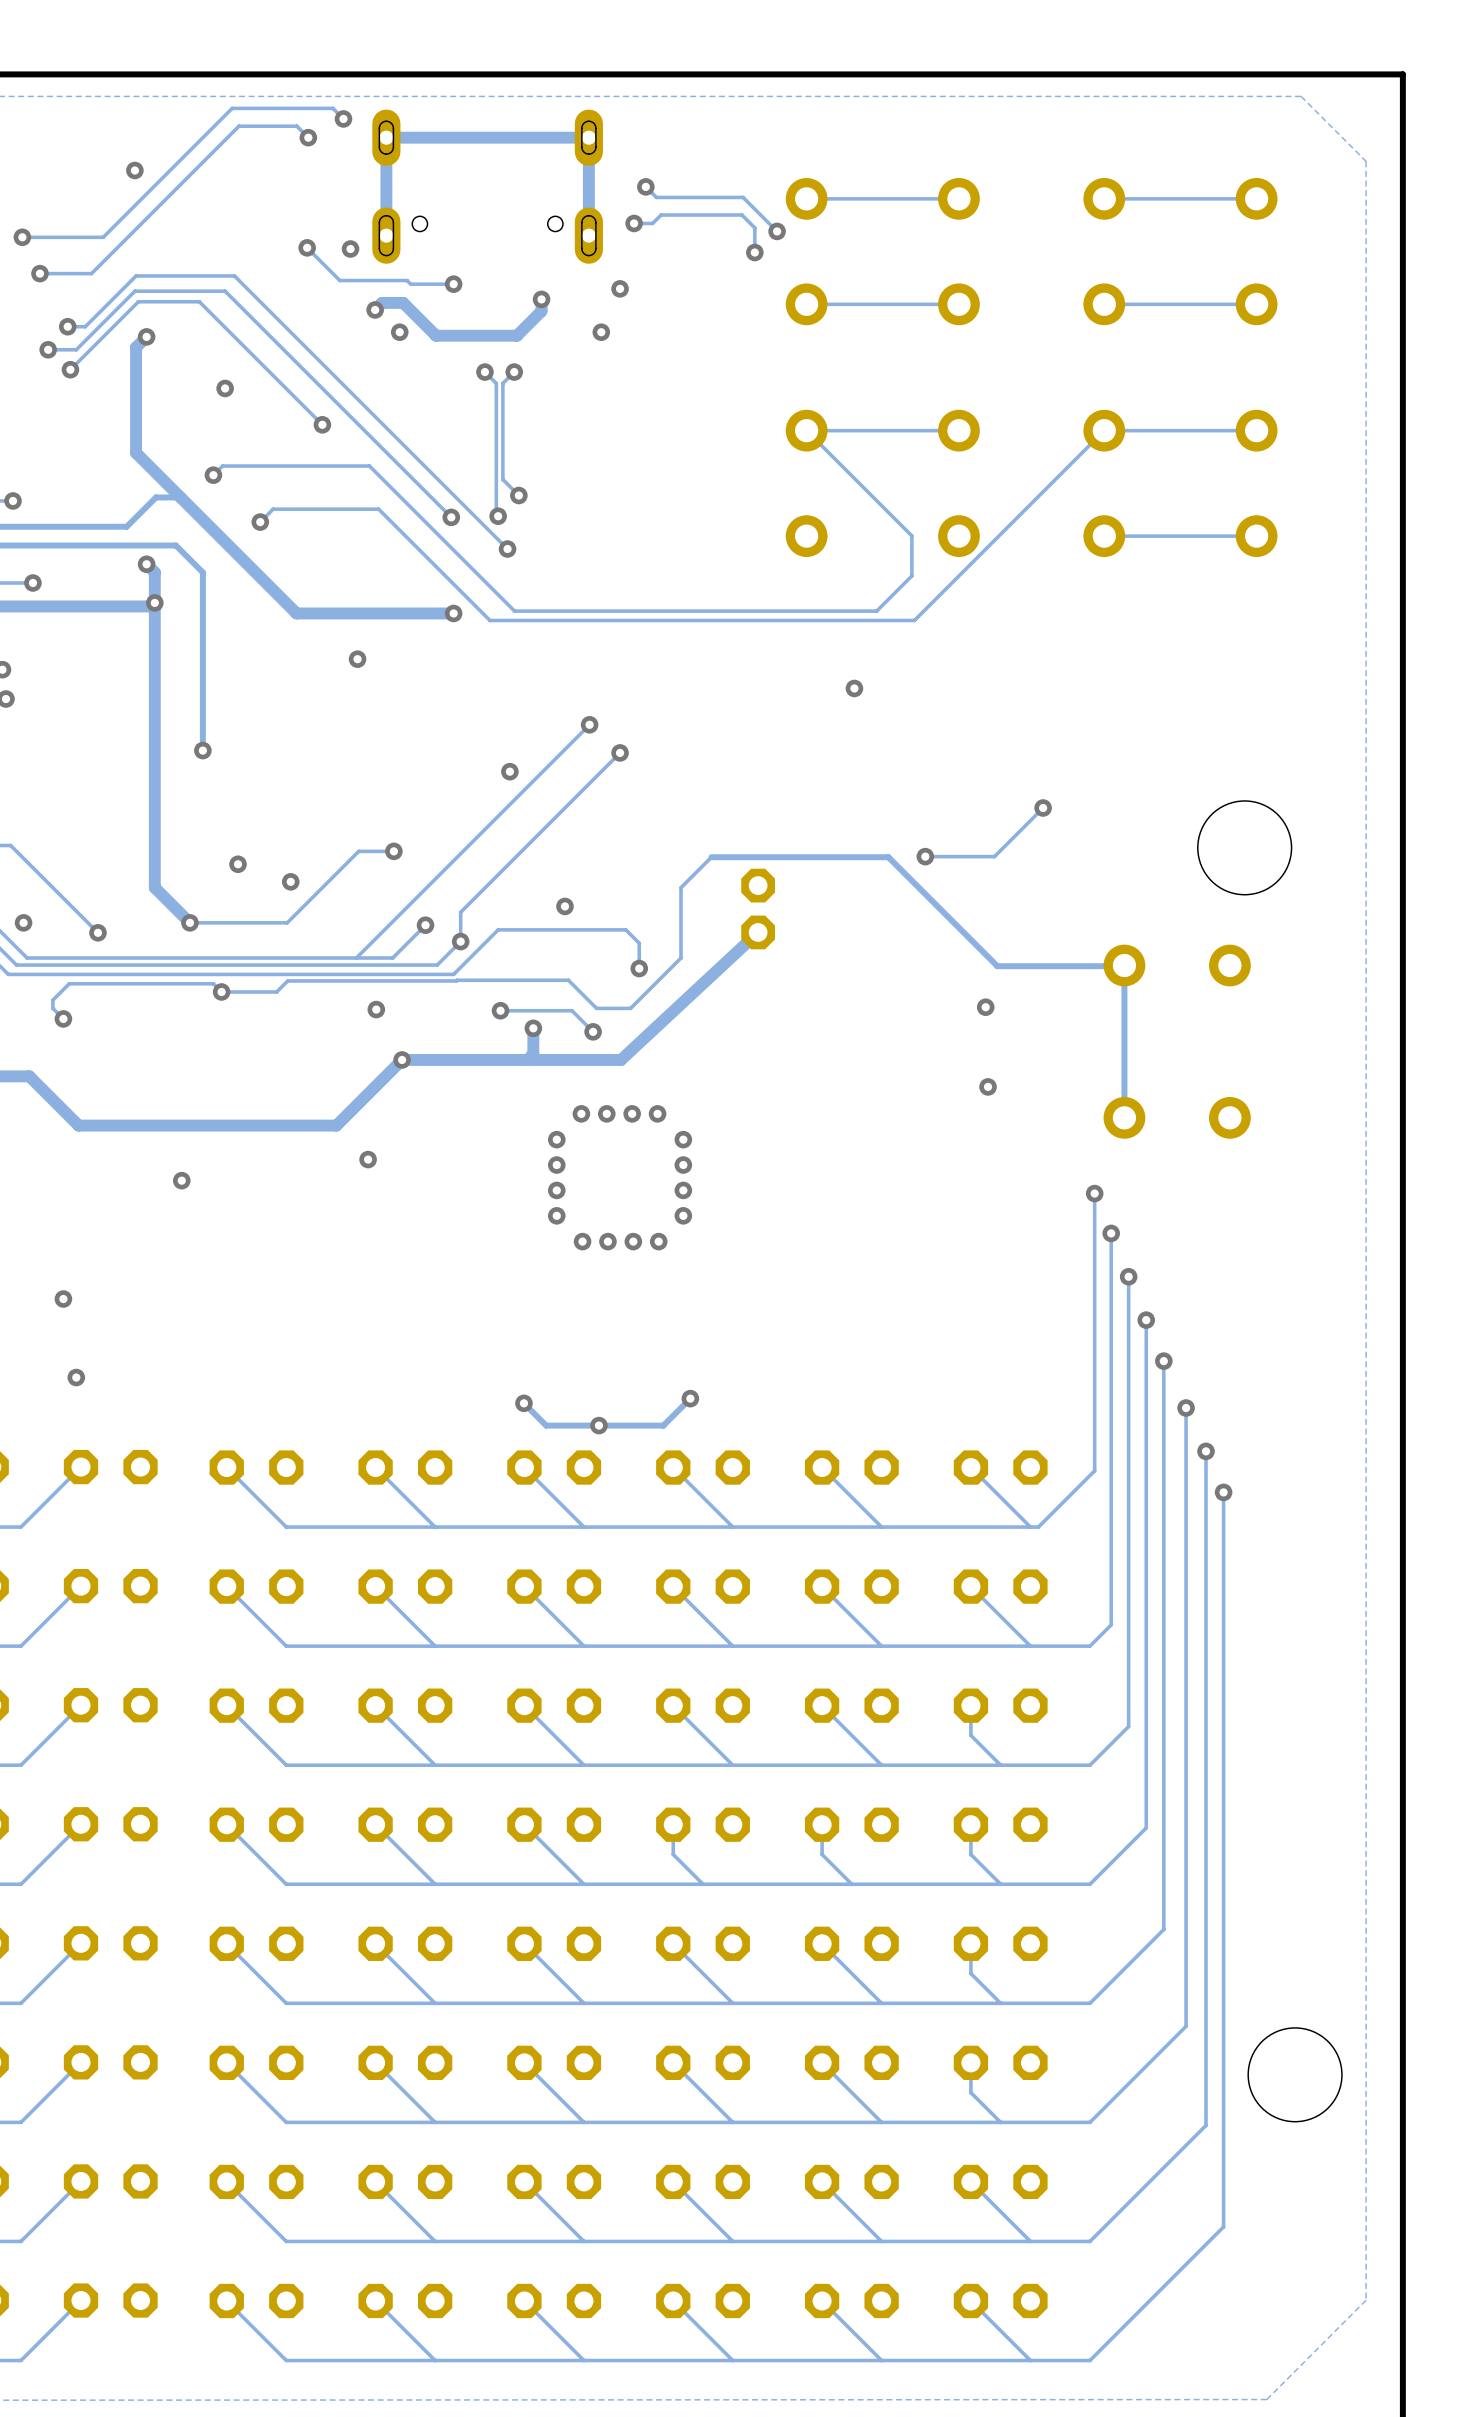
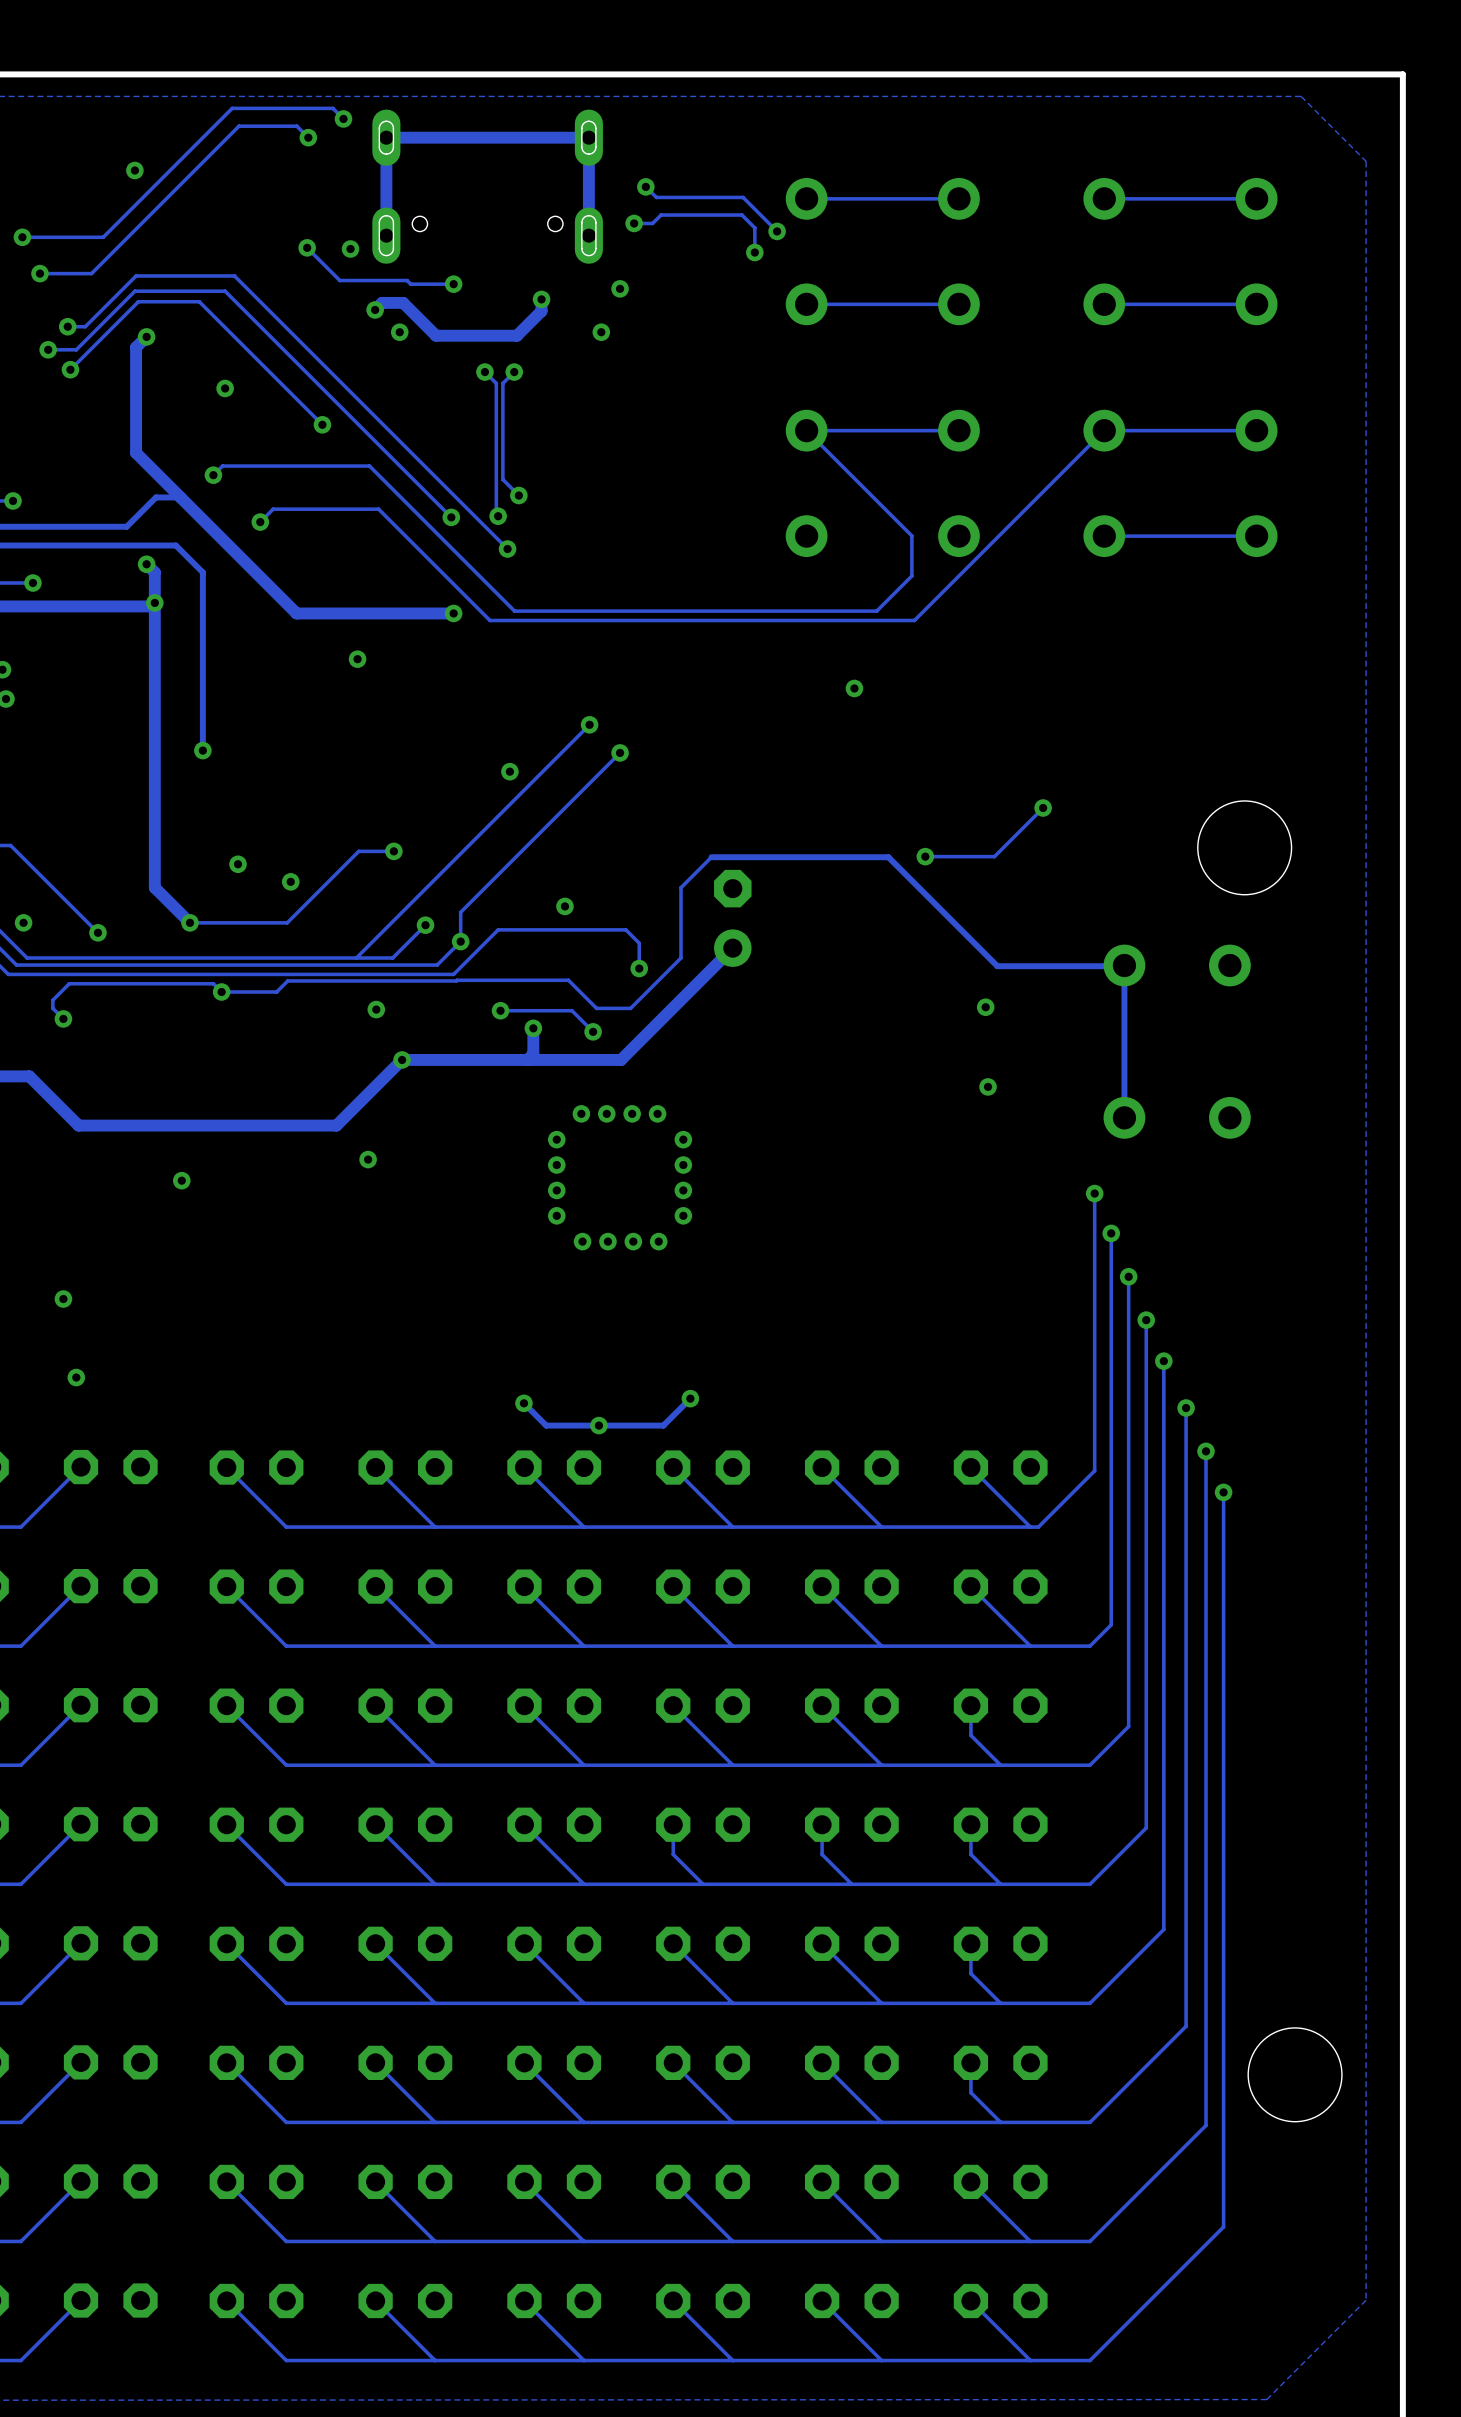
part: (758, 909) -> none
part: none -> (732, 918)
track: (758, 932) (621, 1059) -> (732, 948) (621, 1059)

